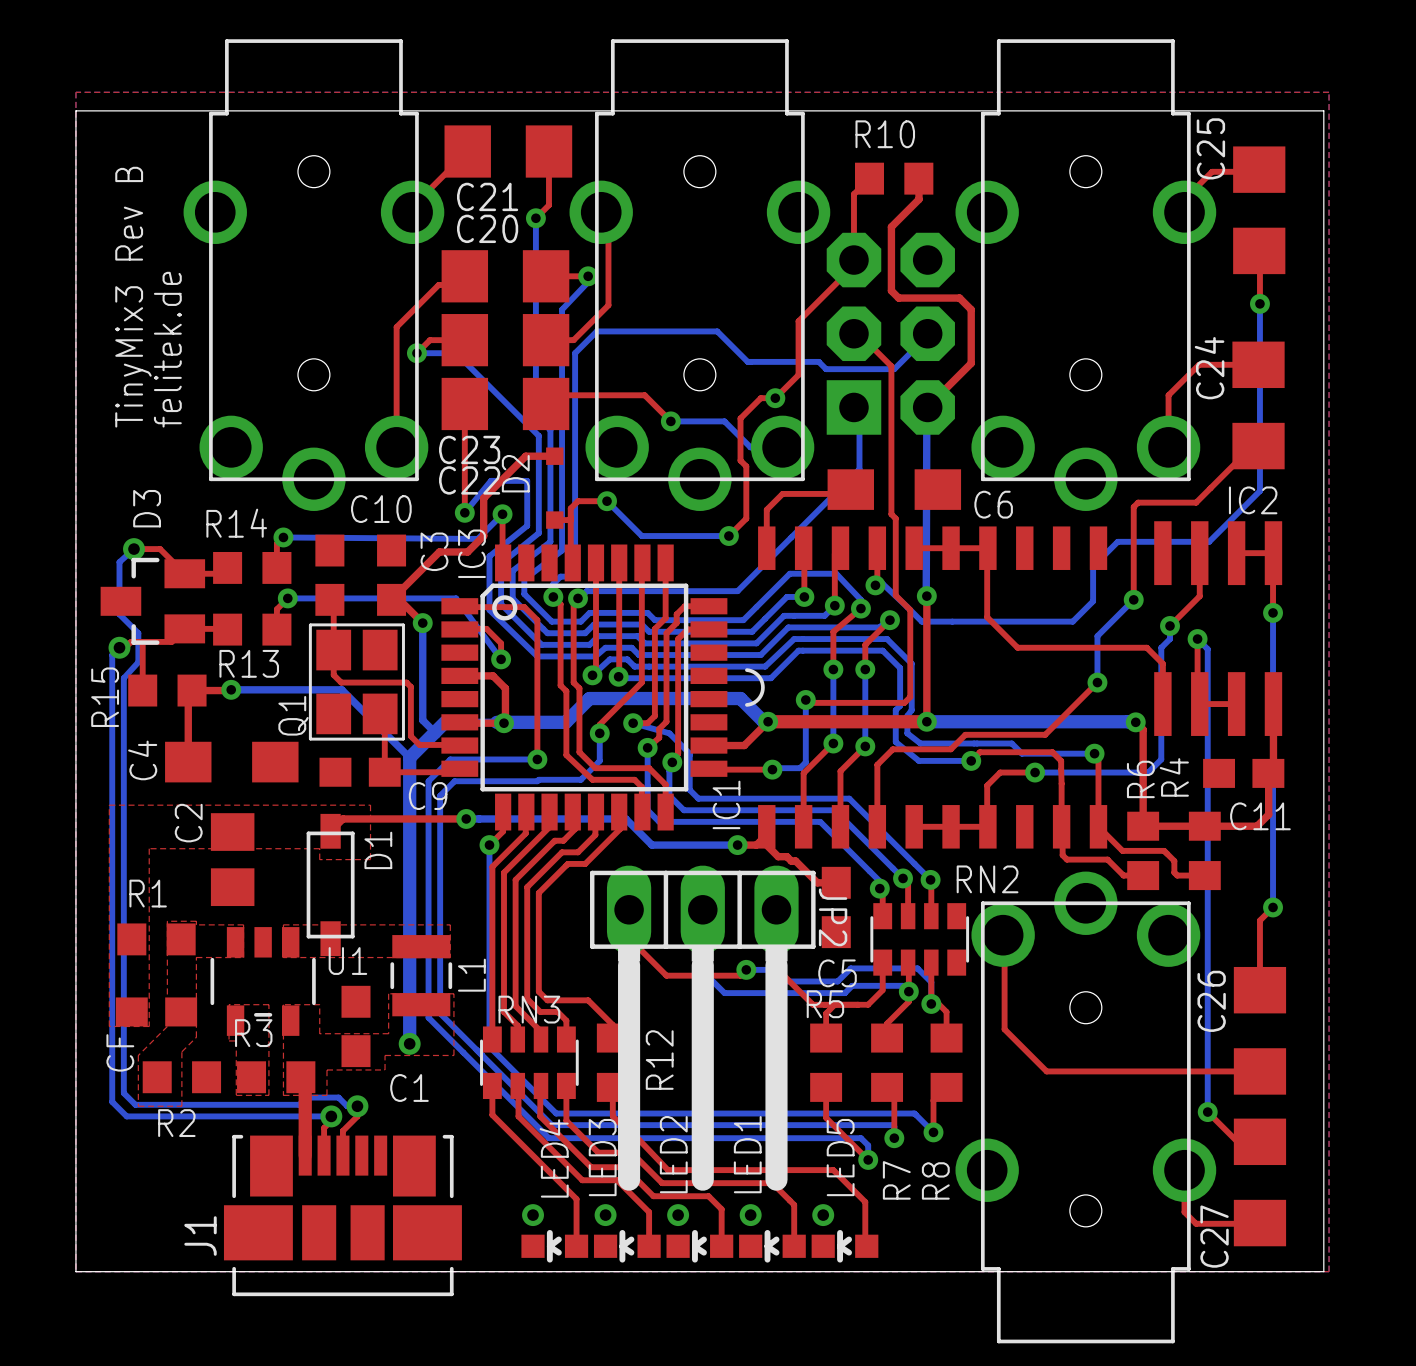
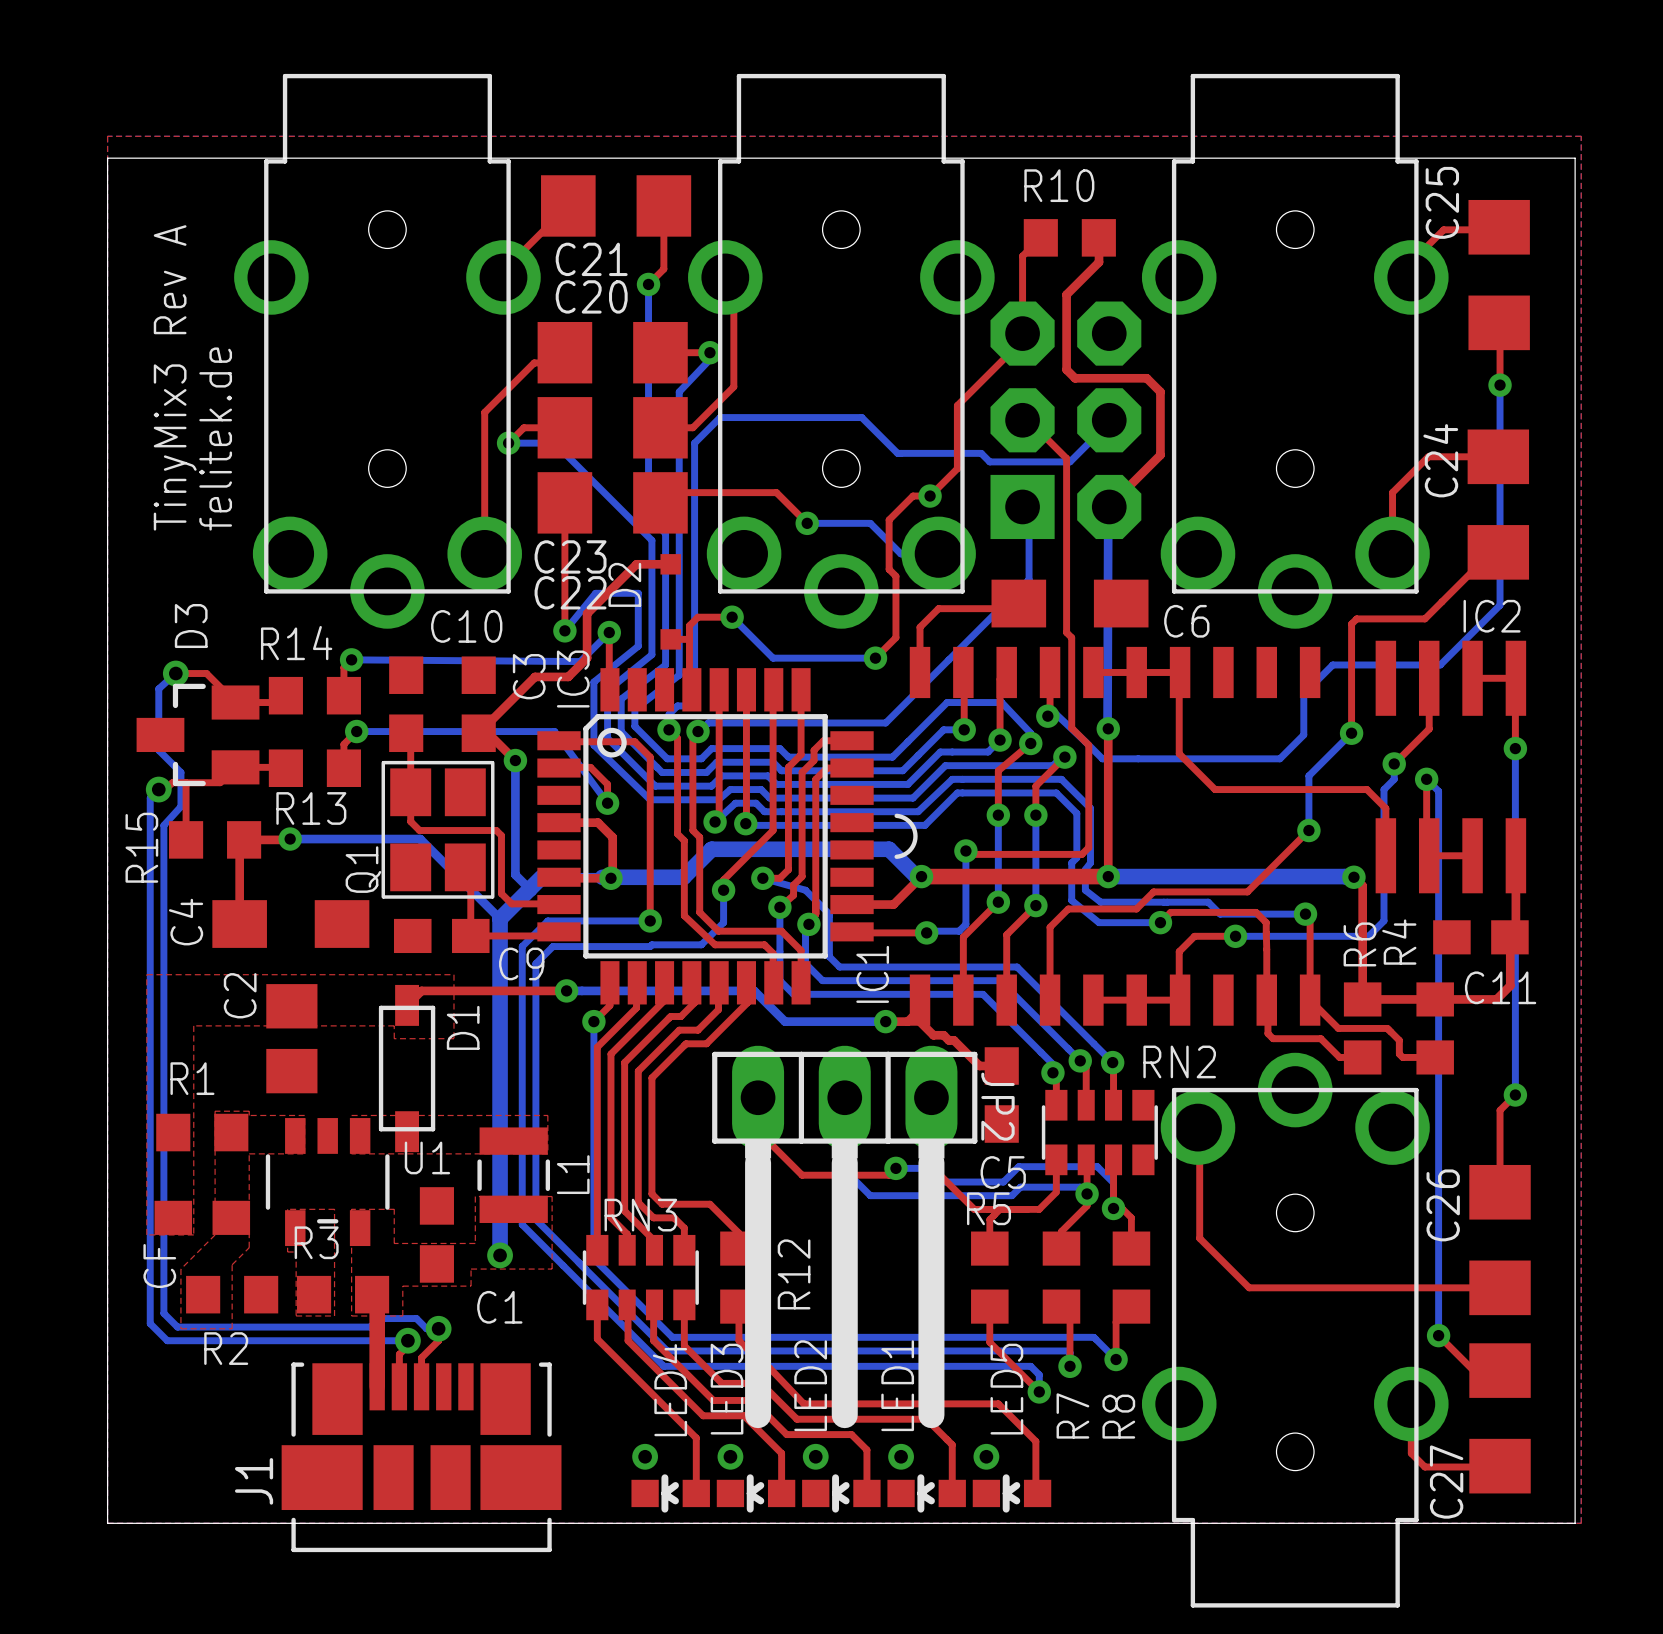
text: TinyMix3 Rev B (133, 297) -> TinyMix3 Rev A (175, 377)

